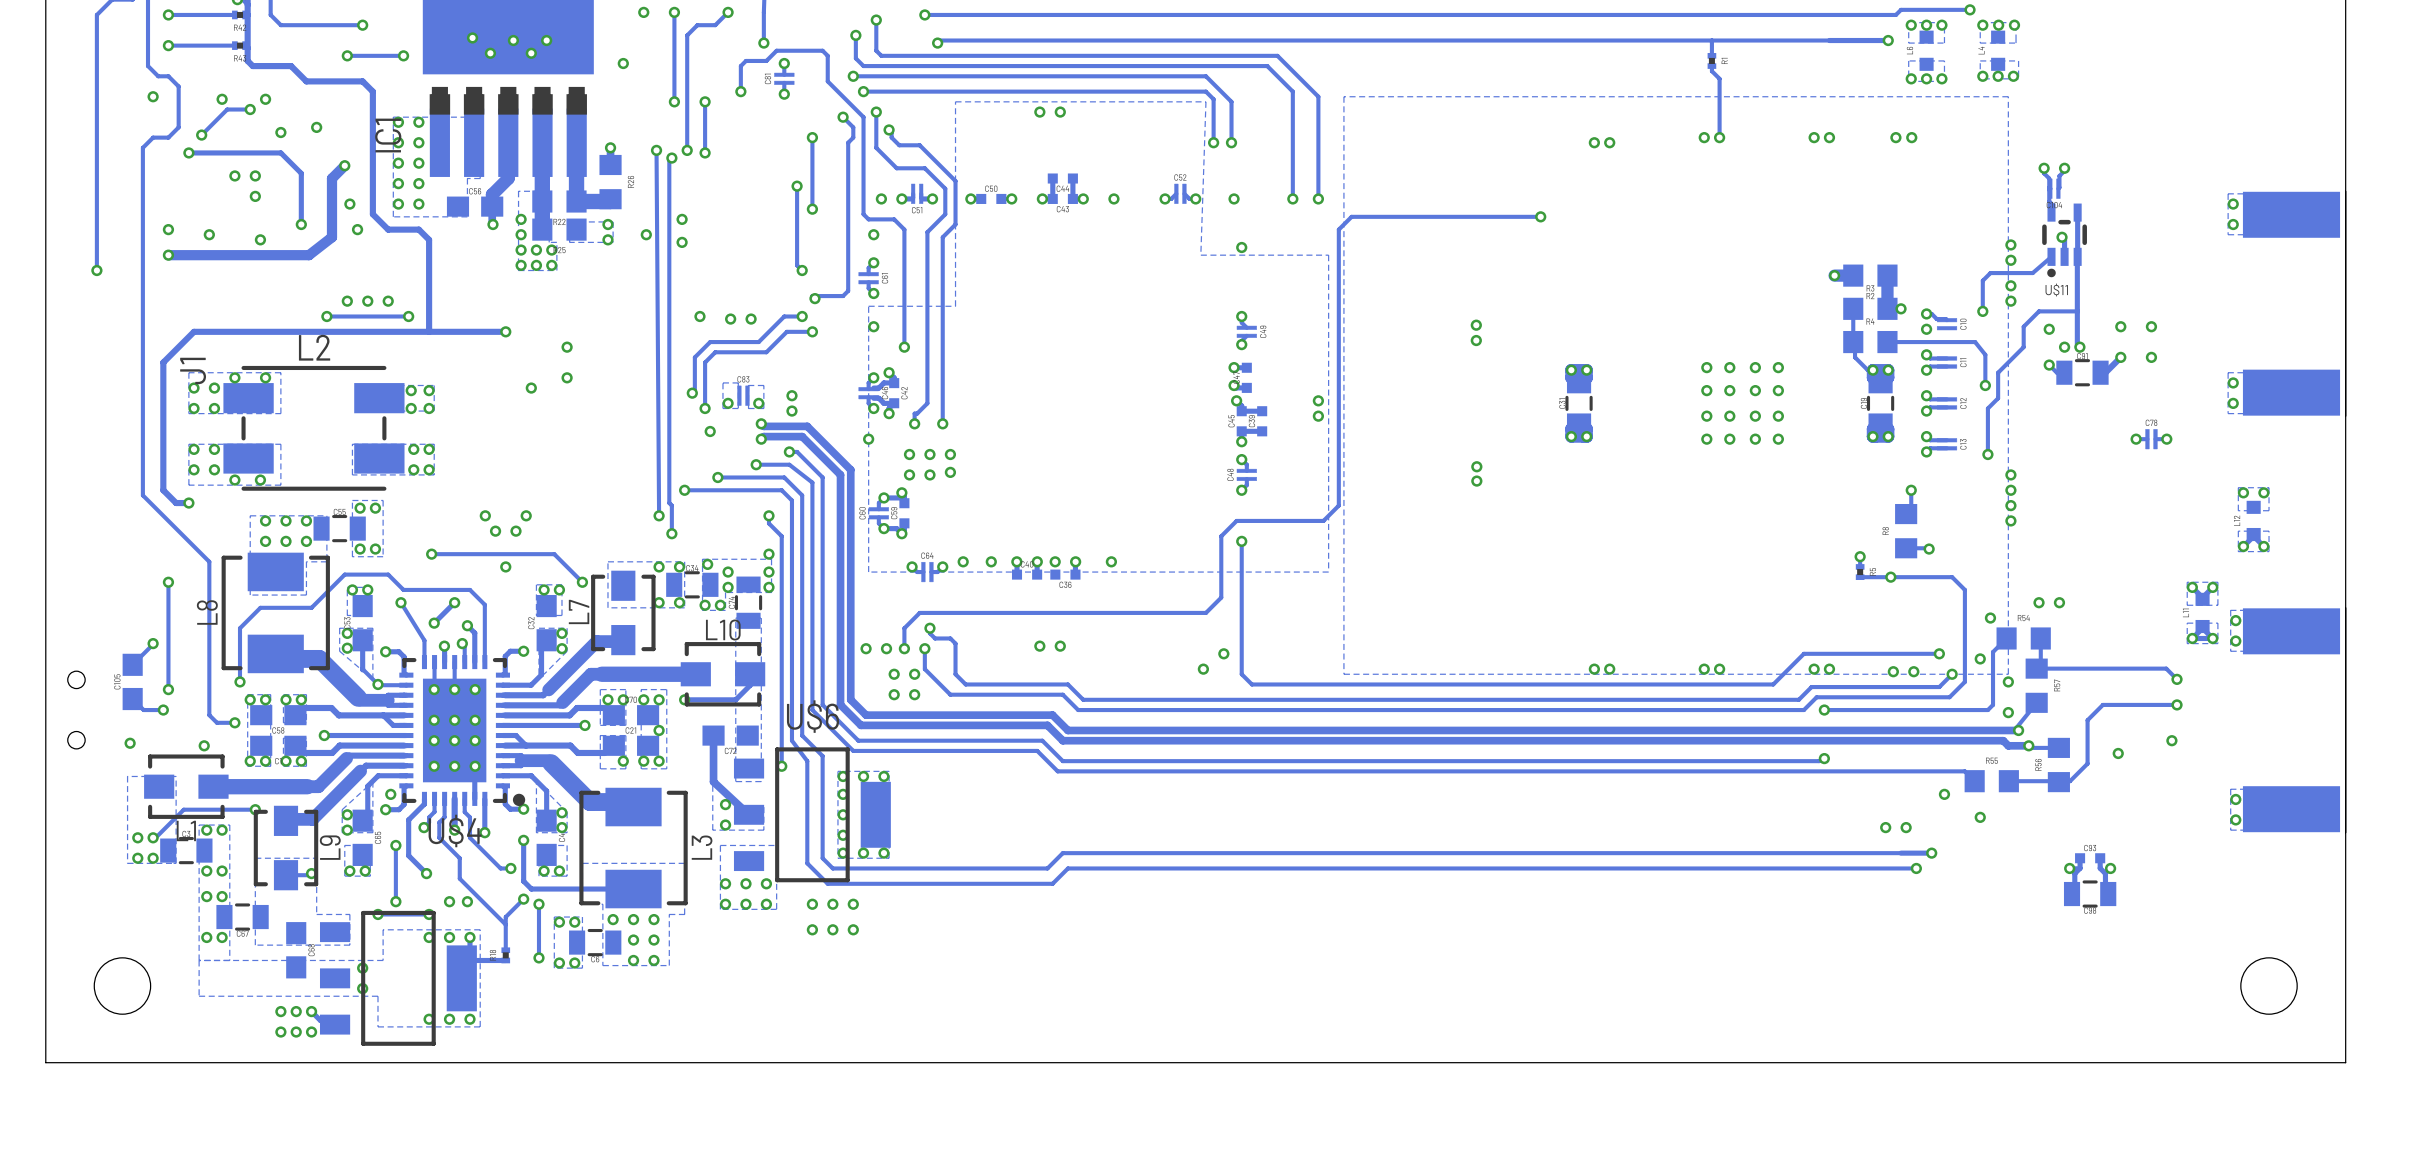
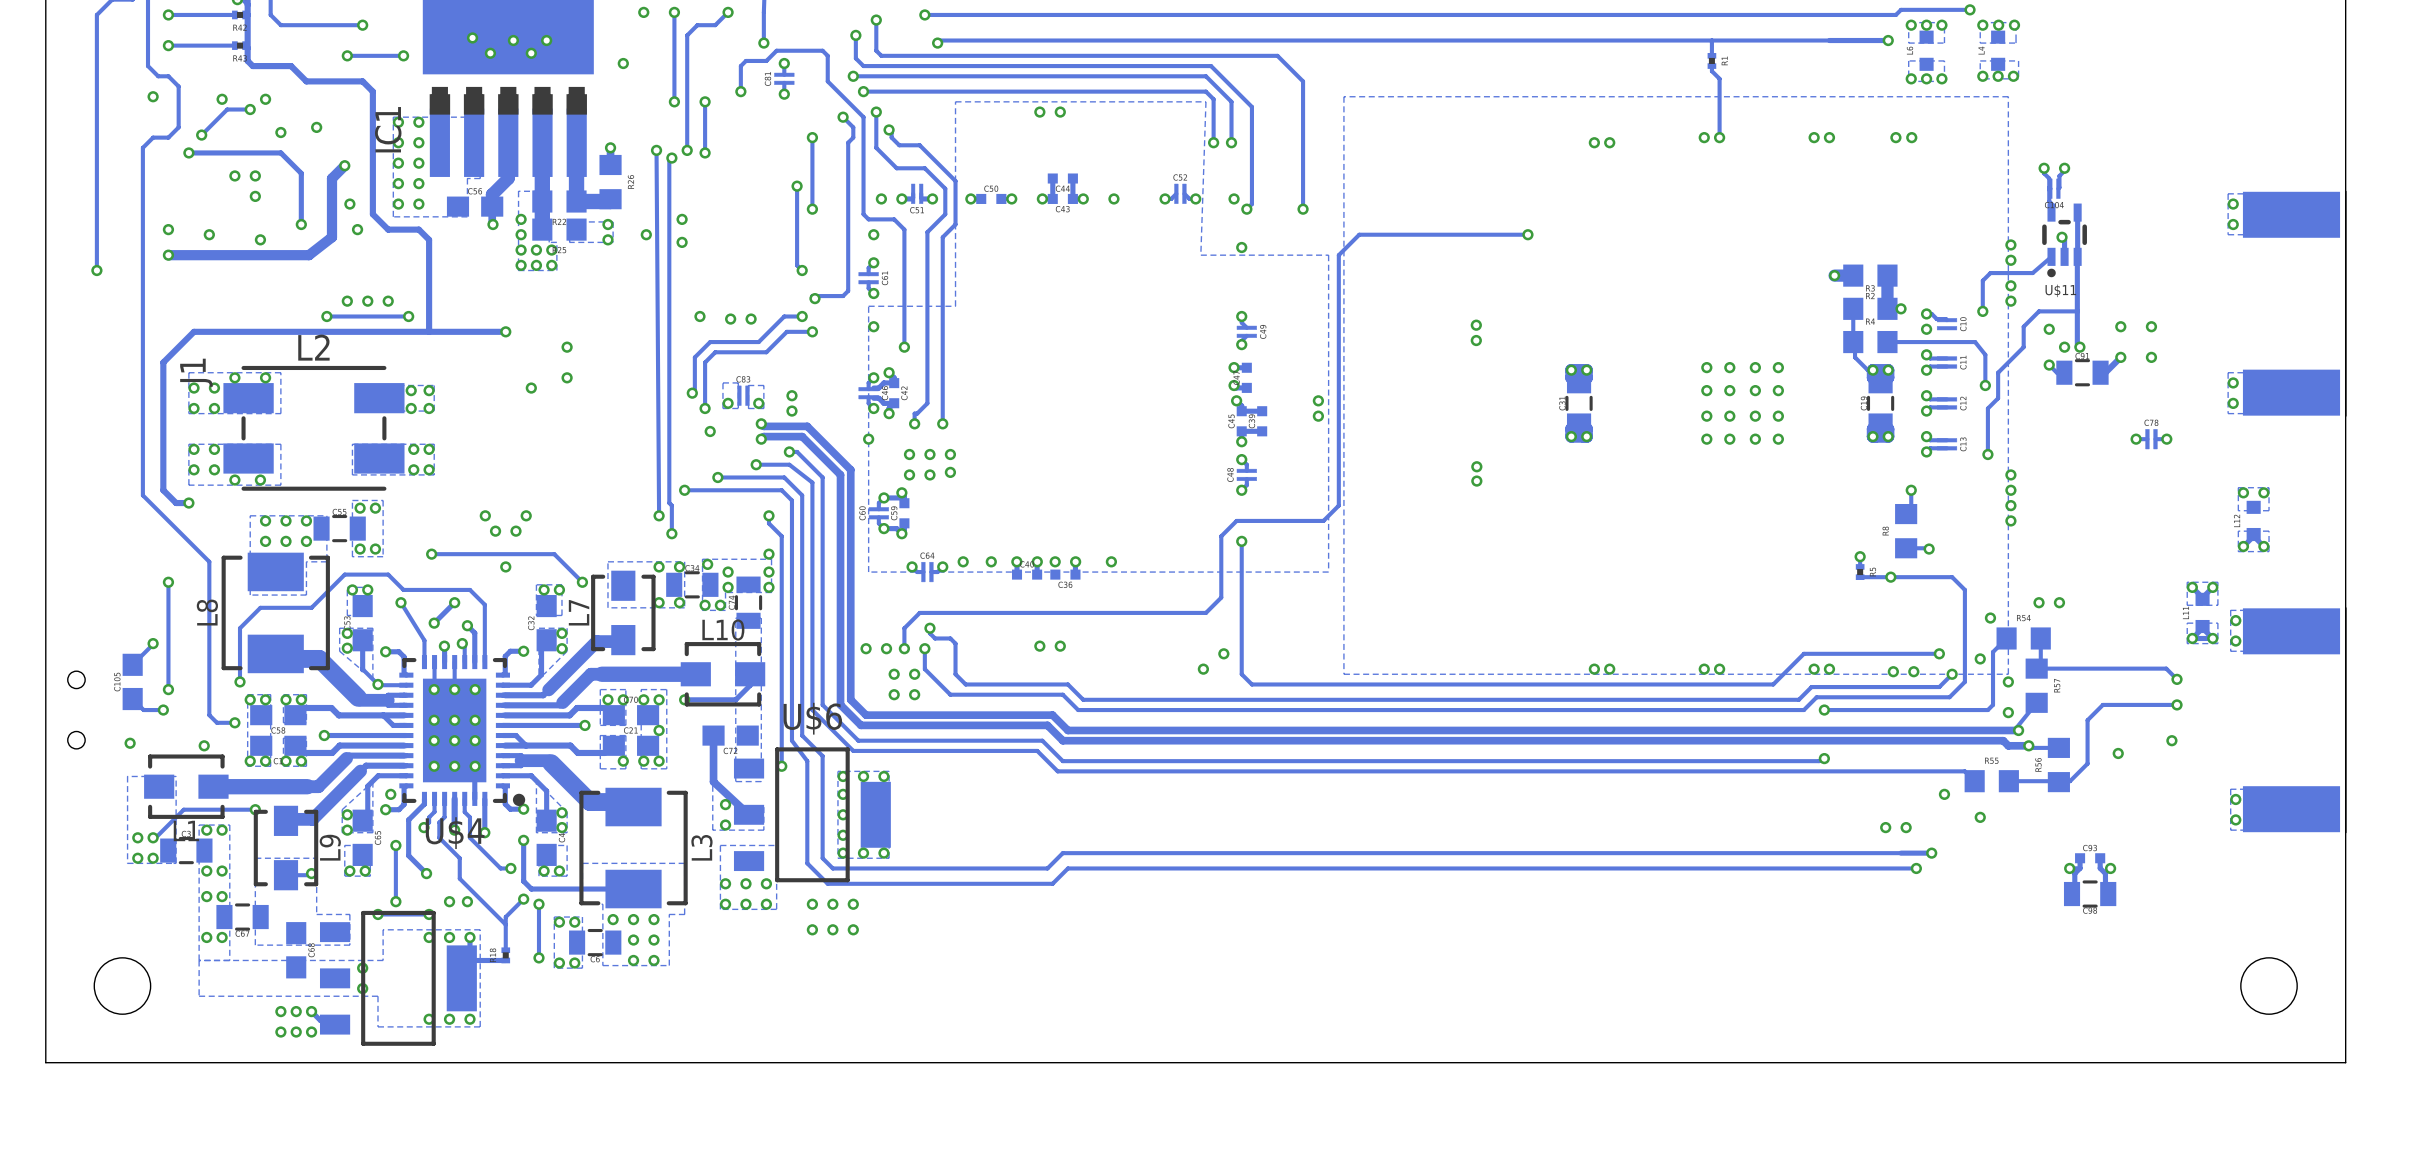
track: (1211, 66) (1267, 66) (1292, 91) (1292, 198) -> (1211, 66) (1251, 106) (1251, 204) (1246, 209)
track: (1303, 81) (1318, 96) (1318, 198) -> (1303, 81) (1303, 209)
via position: (1292, 198) -> (1303, 209)
via: (1318, 198) -> none
via: none -> (1246, 209)
track: (1540, 216) (1351, 216) (1338, 229) (1338, 255) -> (1527, 234) (1359, 234) (1338, 255)
via position: (1540, 216) -> (1527, 234)

